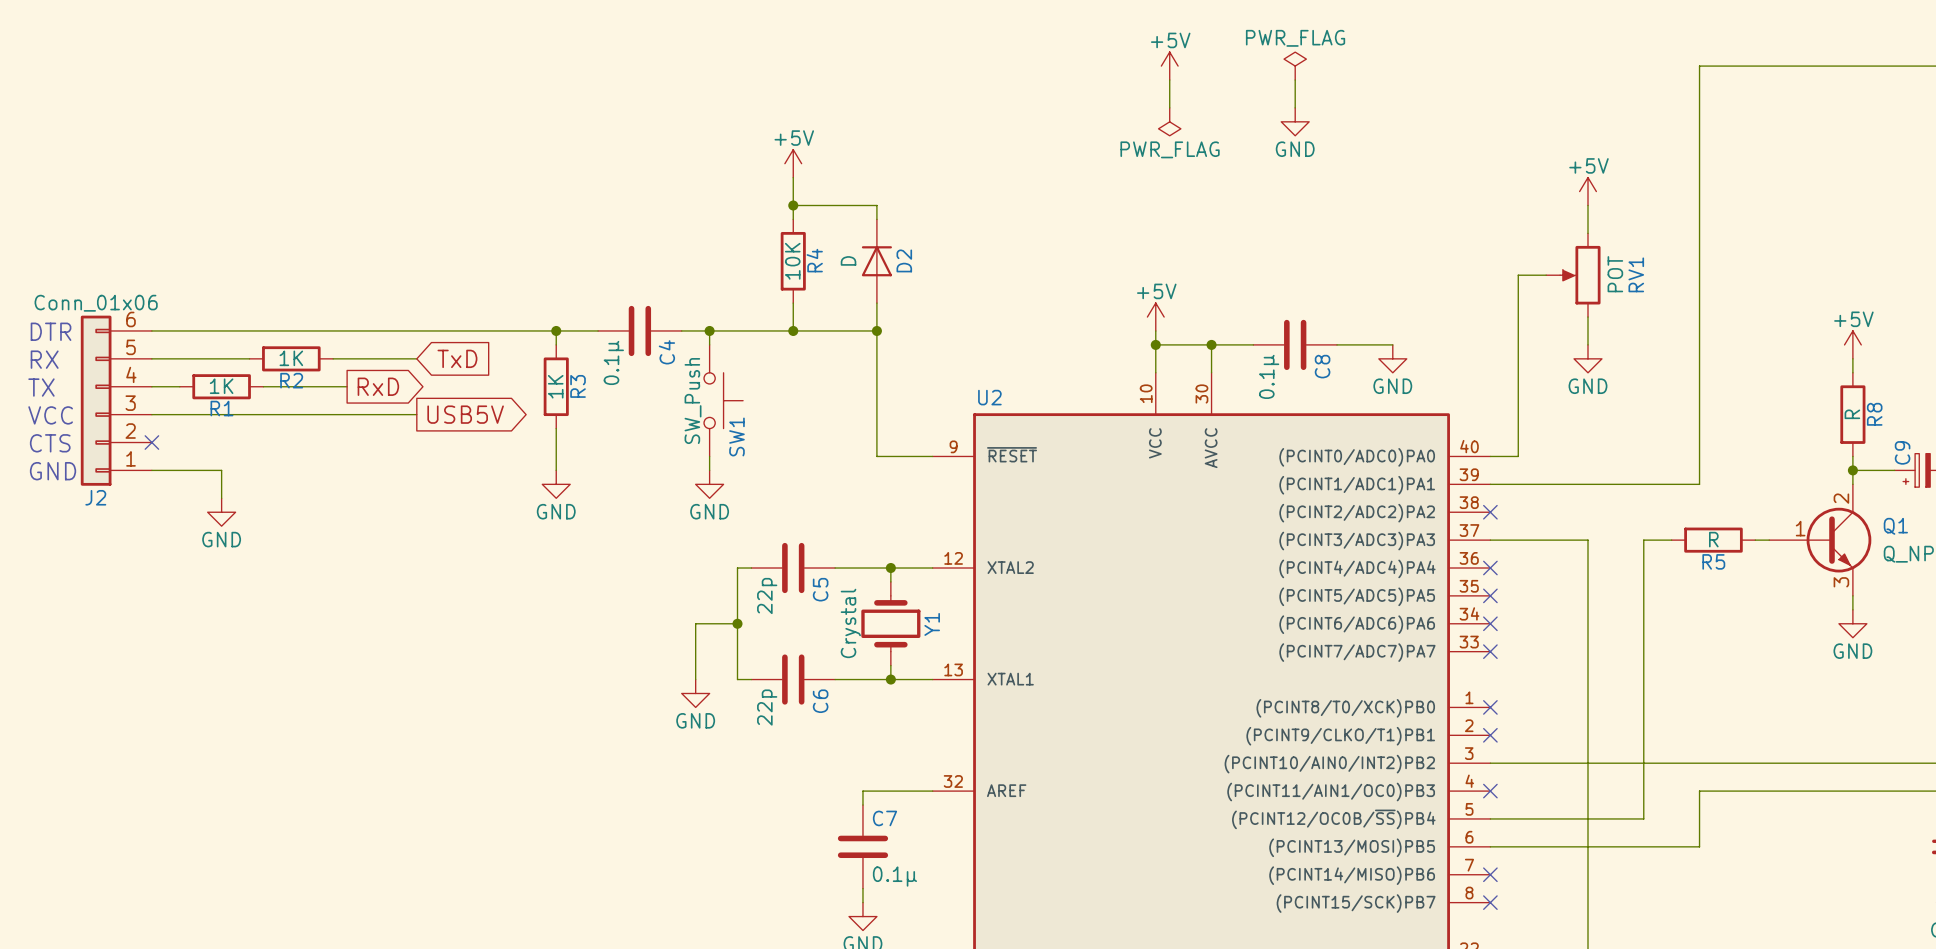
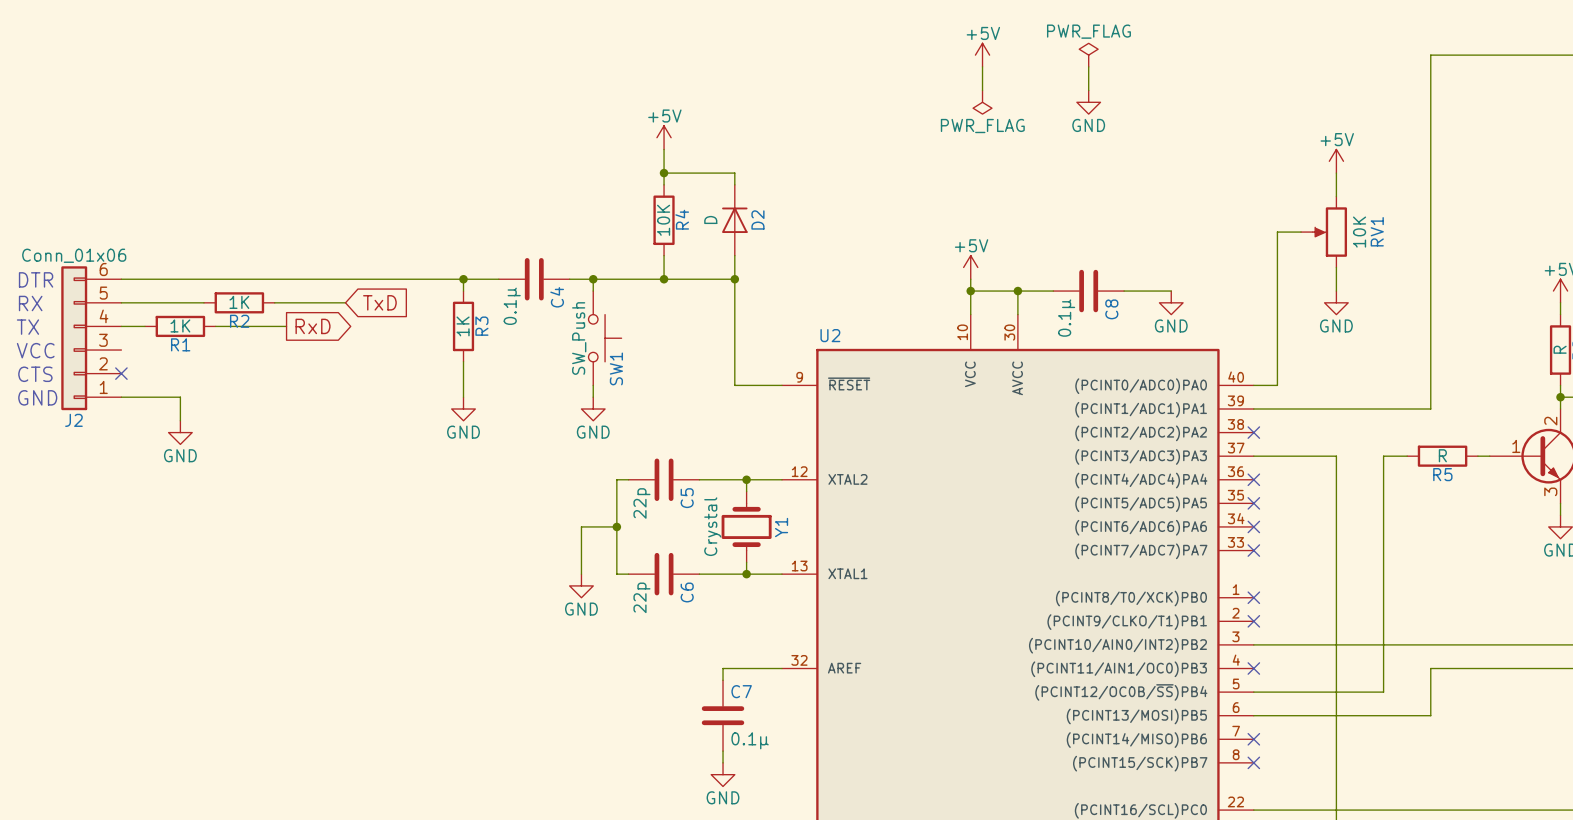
RV1 value: POT (1615, 274) -> 10K (1359, 232)
wire: (151, 414) (416, 414) -> none
global label: USB5V (465, 414) -> none

